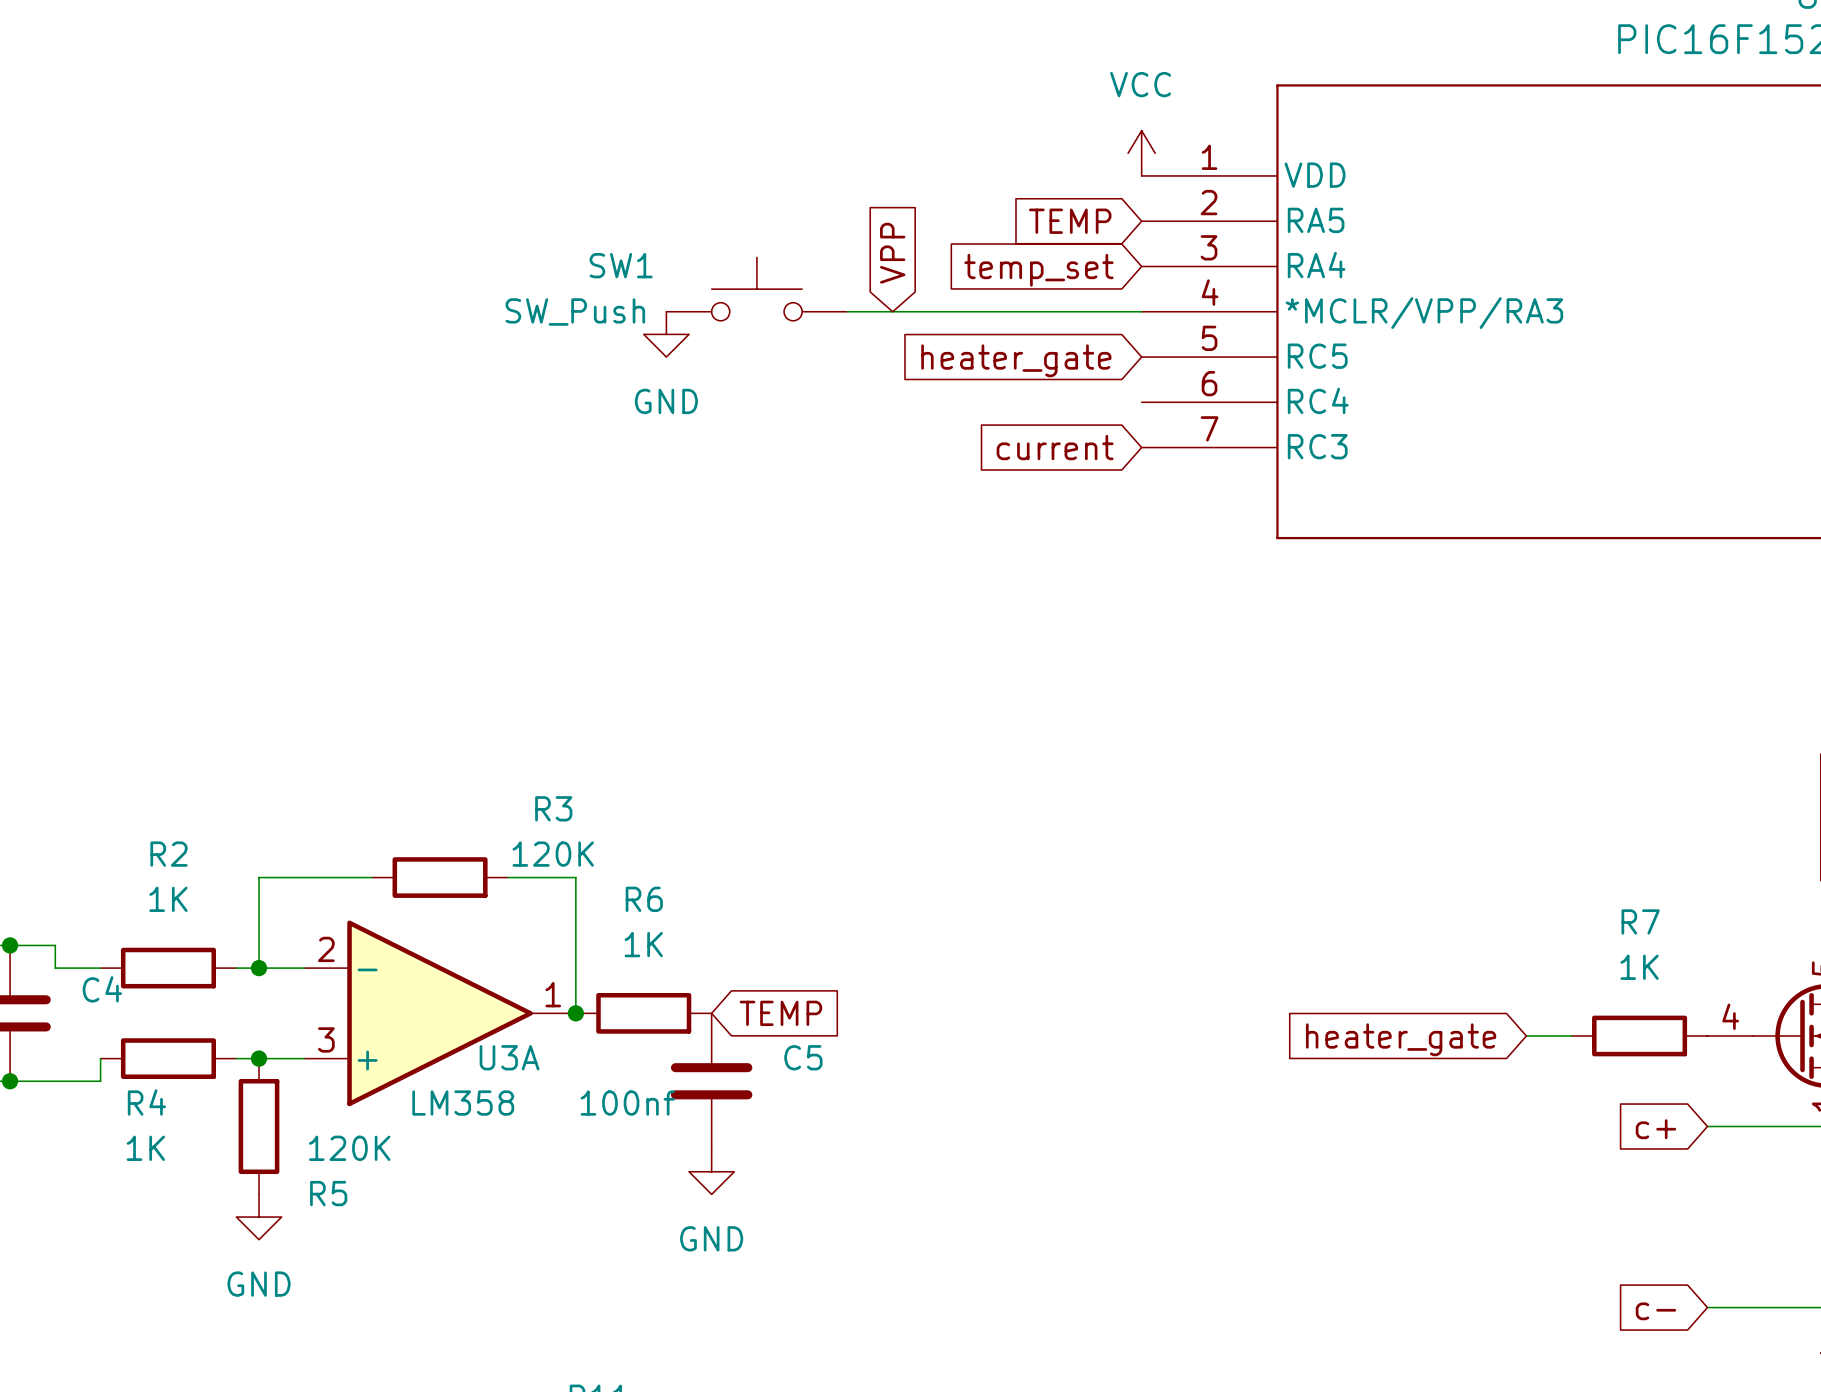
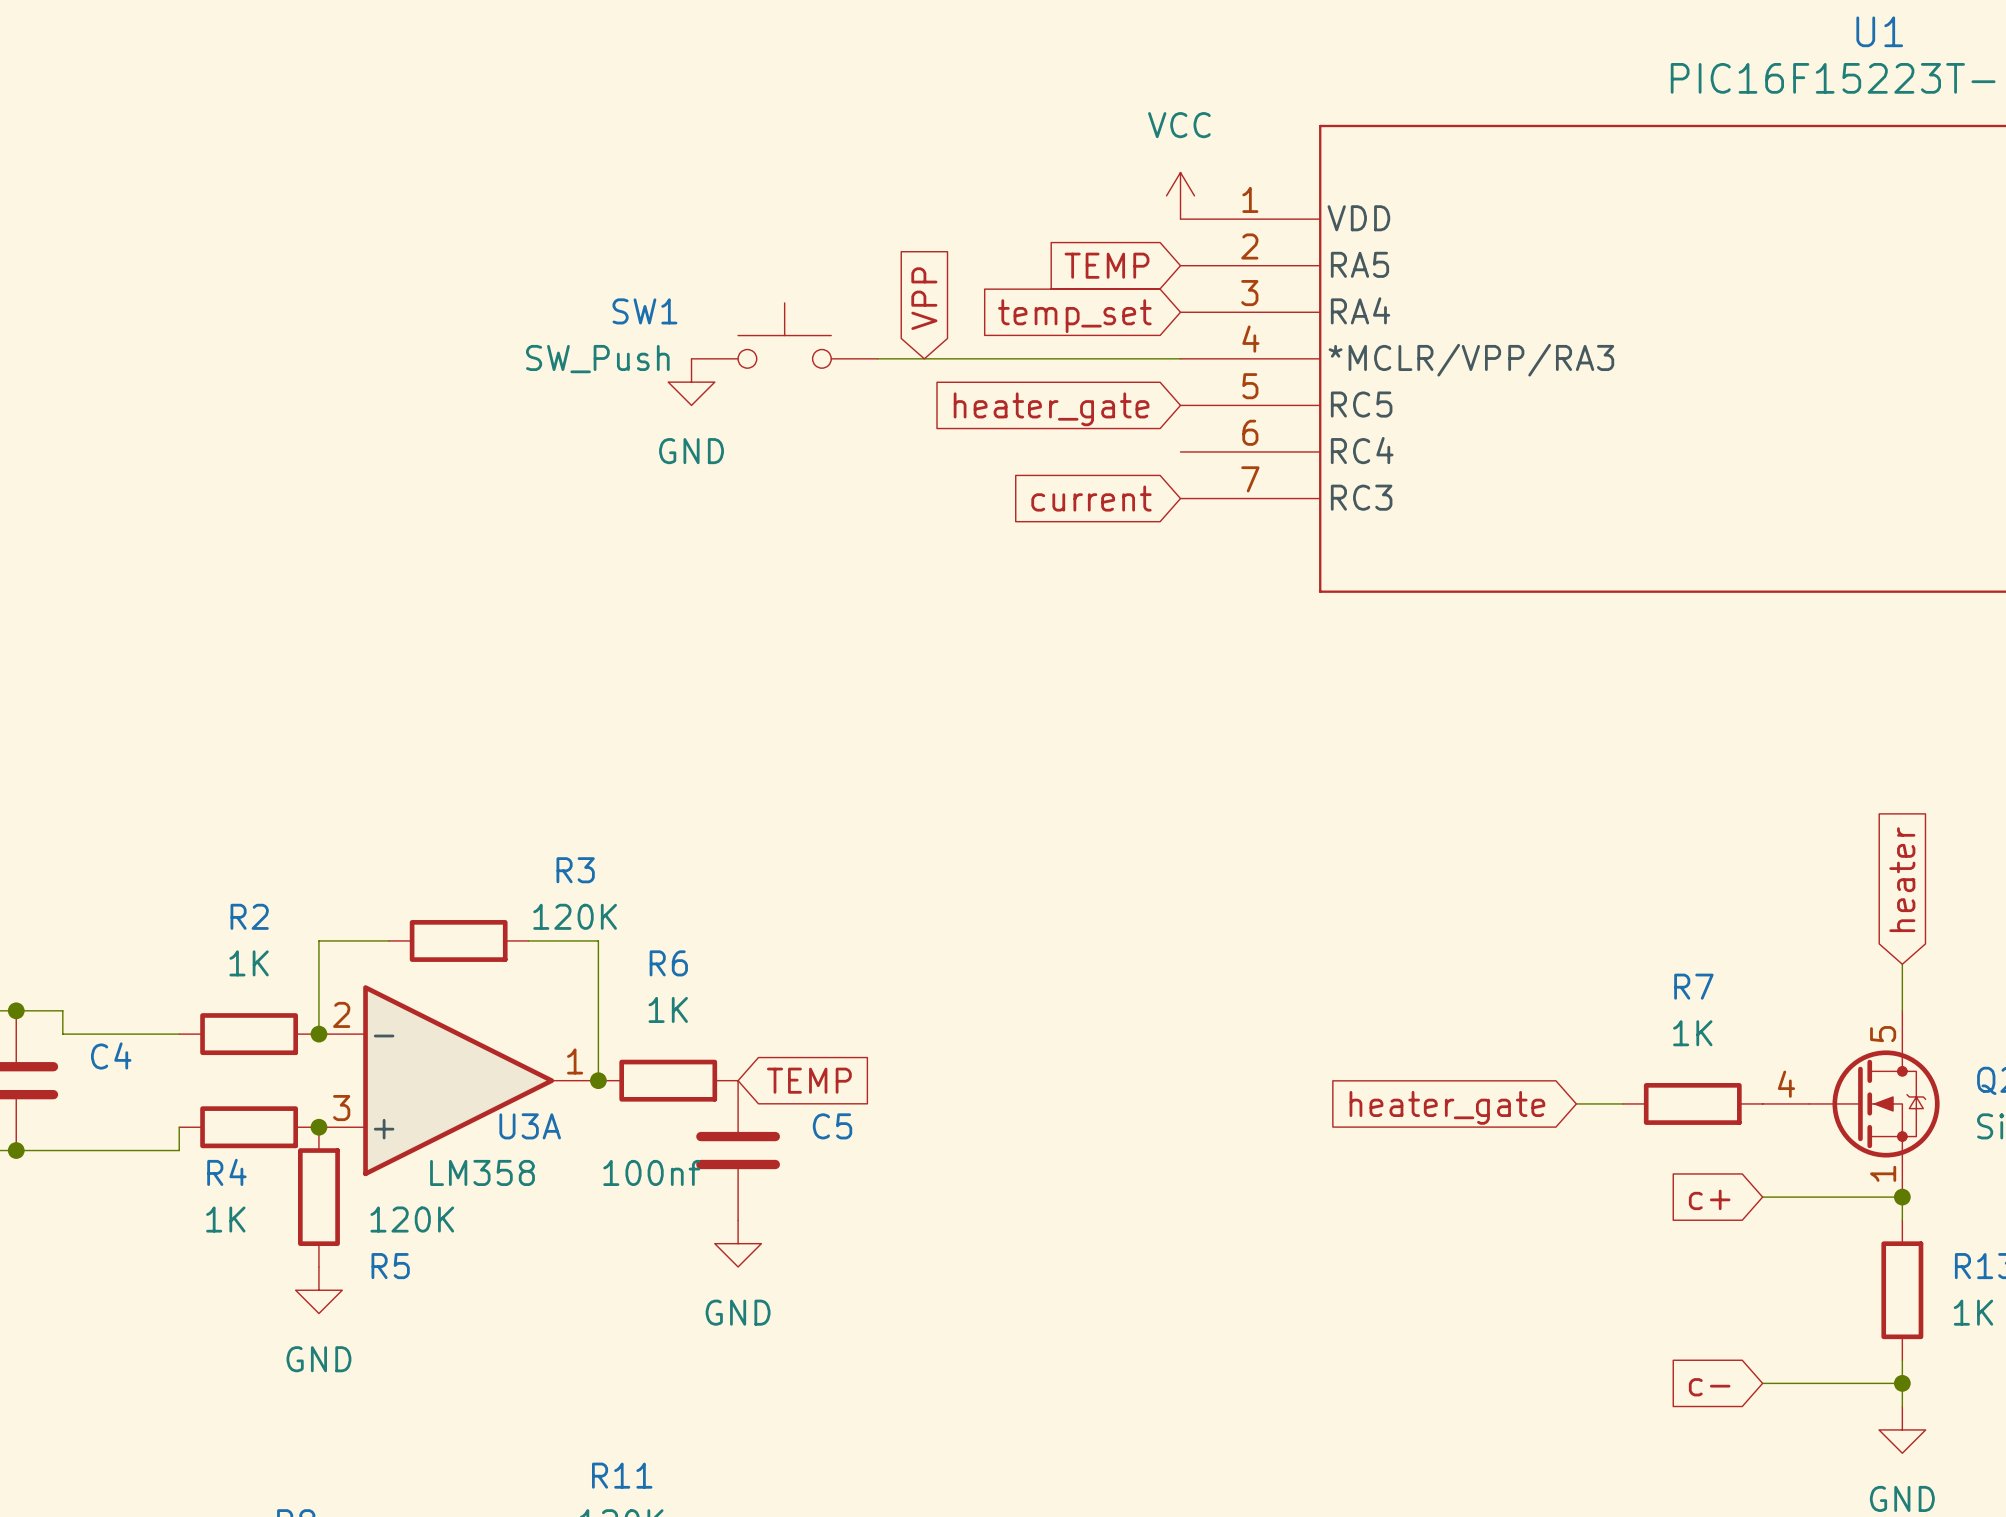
wire: (304, 877) (259, 877) (259, 968) -> (318, 940) (318, 1034)
R2 position: (168, 968) -> (249, 1034)
wire: (236, 968) (304, 968) -> (109, 1034) (179, 1034)
junction position: (259, 968) -> (318, 1034)
wire: (100, 1058) (100, 1081) -> (179, 1127) (179, 1150) (109, 1150)
R4 position: (168, 1058) -> (249, 1127)
wire: (236, 1058) (304, 1058) -> none
junction position: (259, 1058) -> (318, 1127)
R5 position: (259, 1126) -> (318, 1197)
power symbol position: GND (259, 1217) -> GND (318, 1290)

